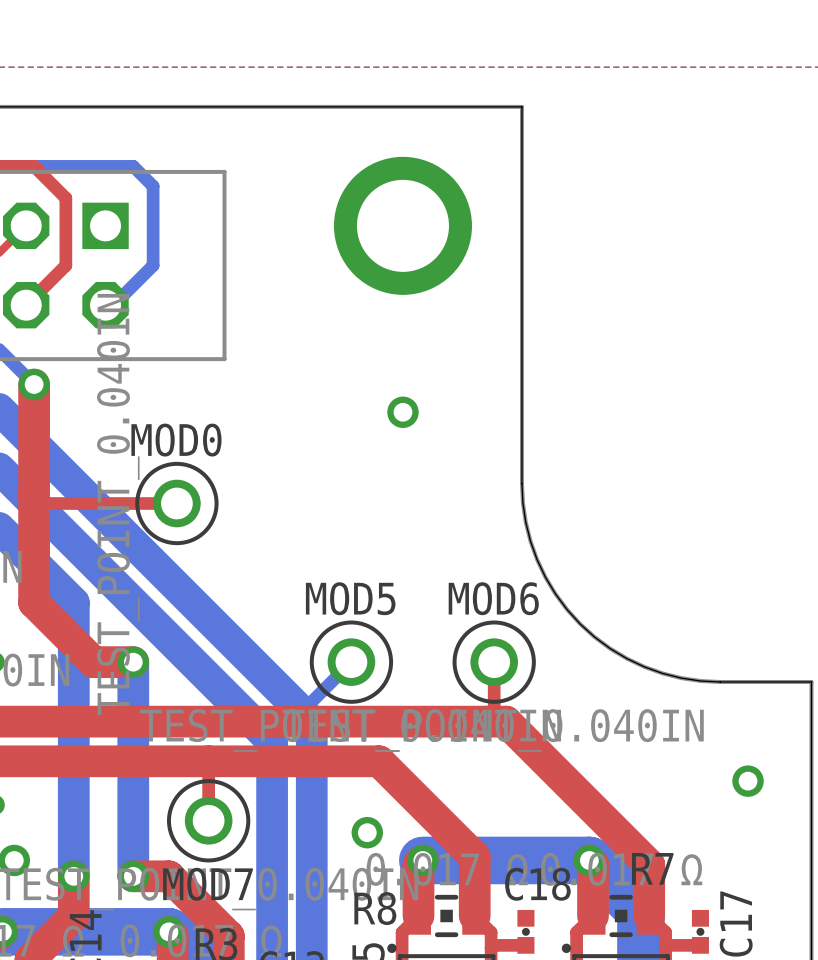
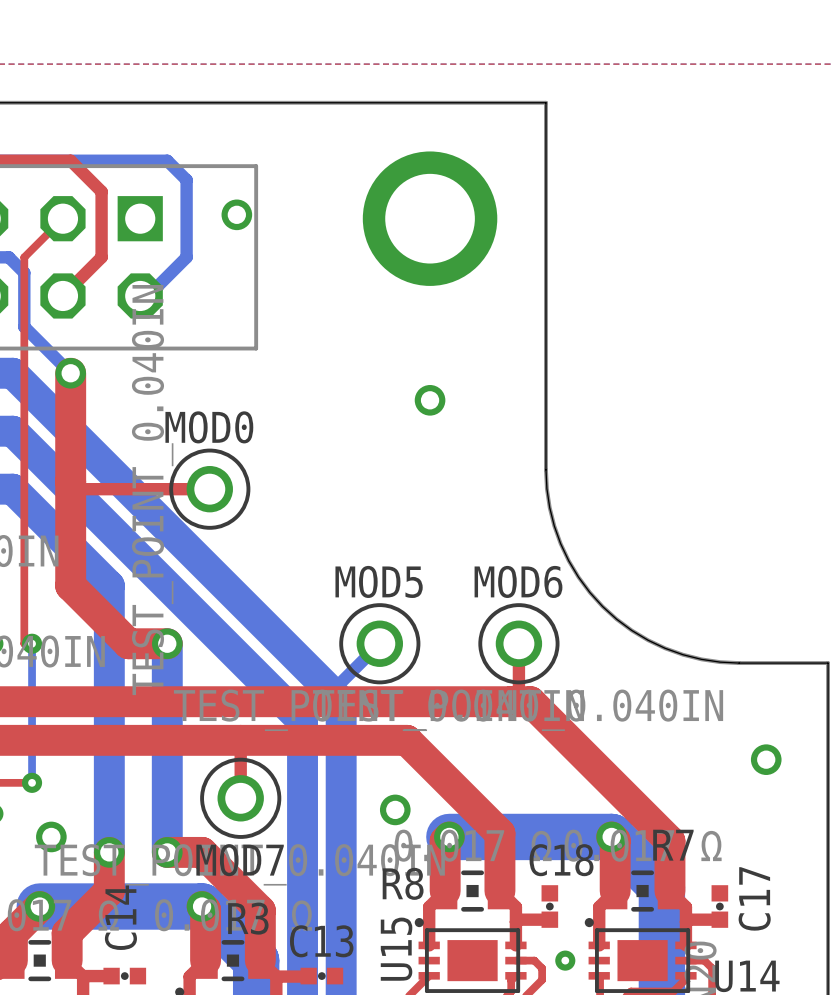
via: none -> (236, 214)

